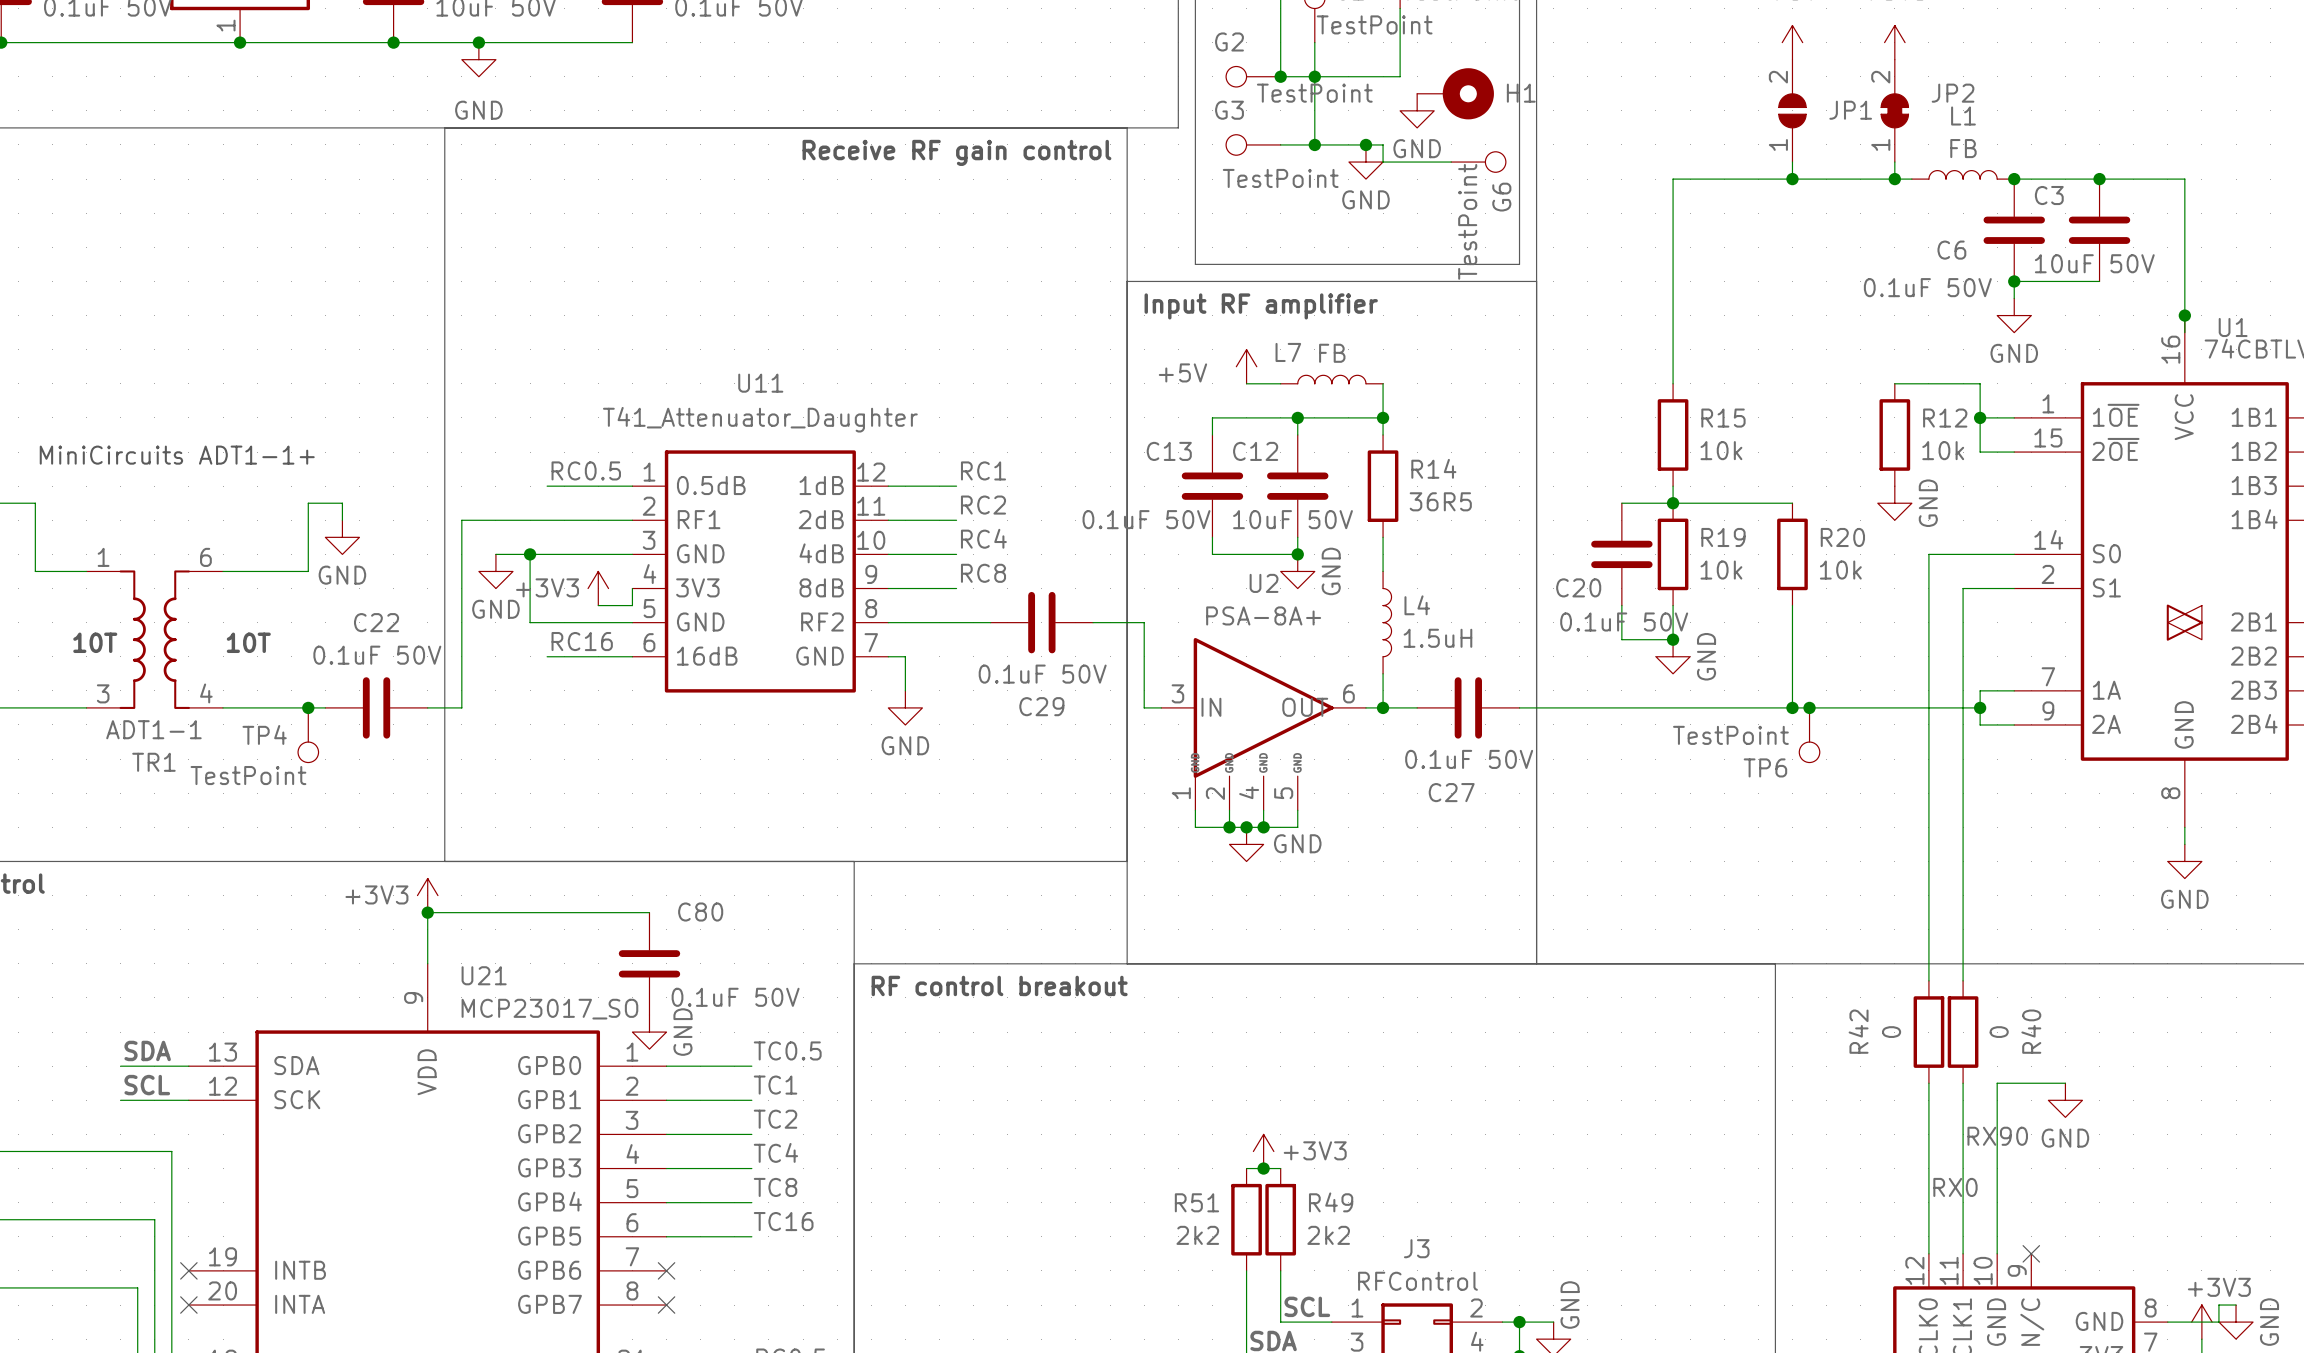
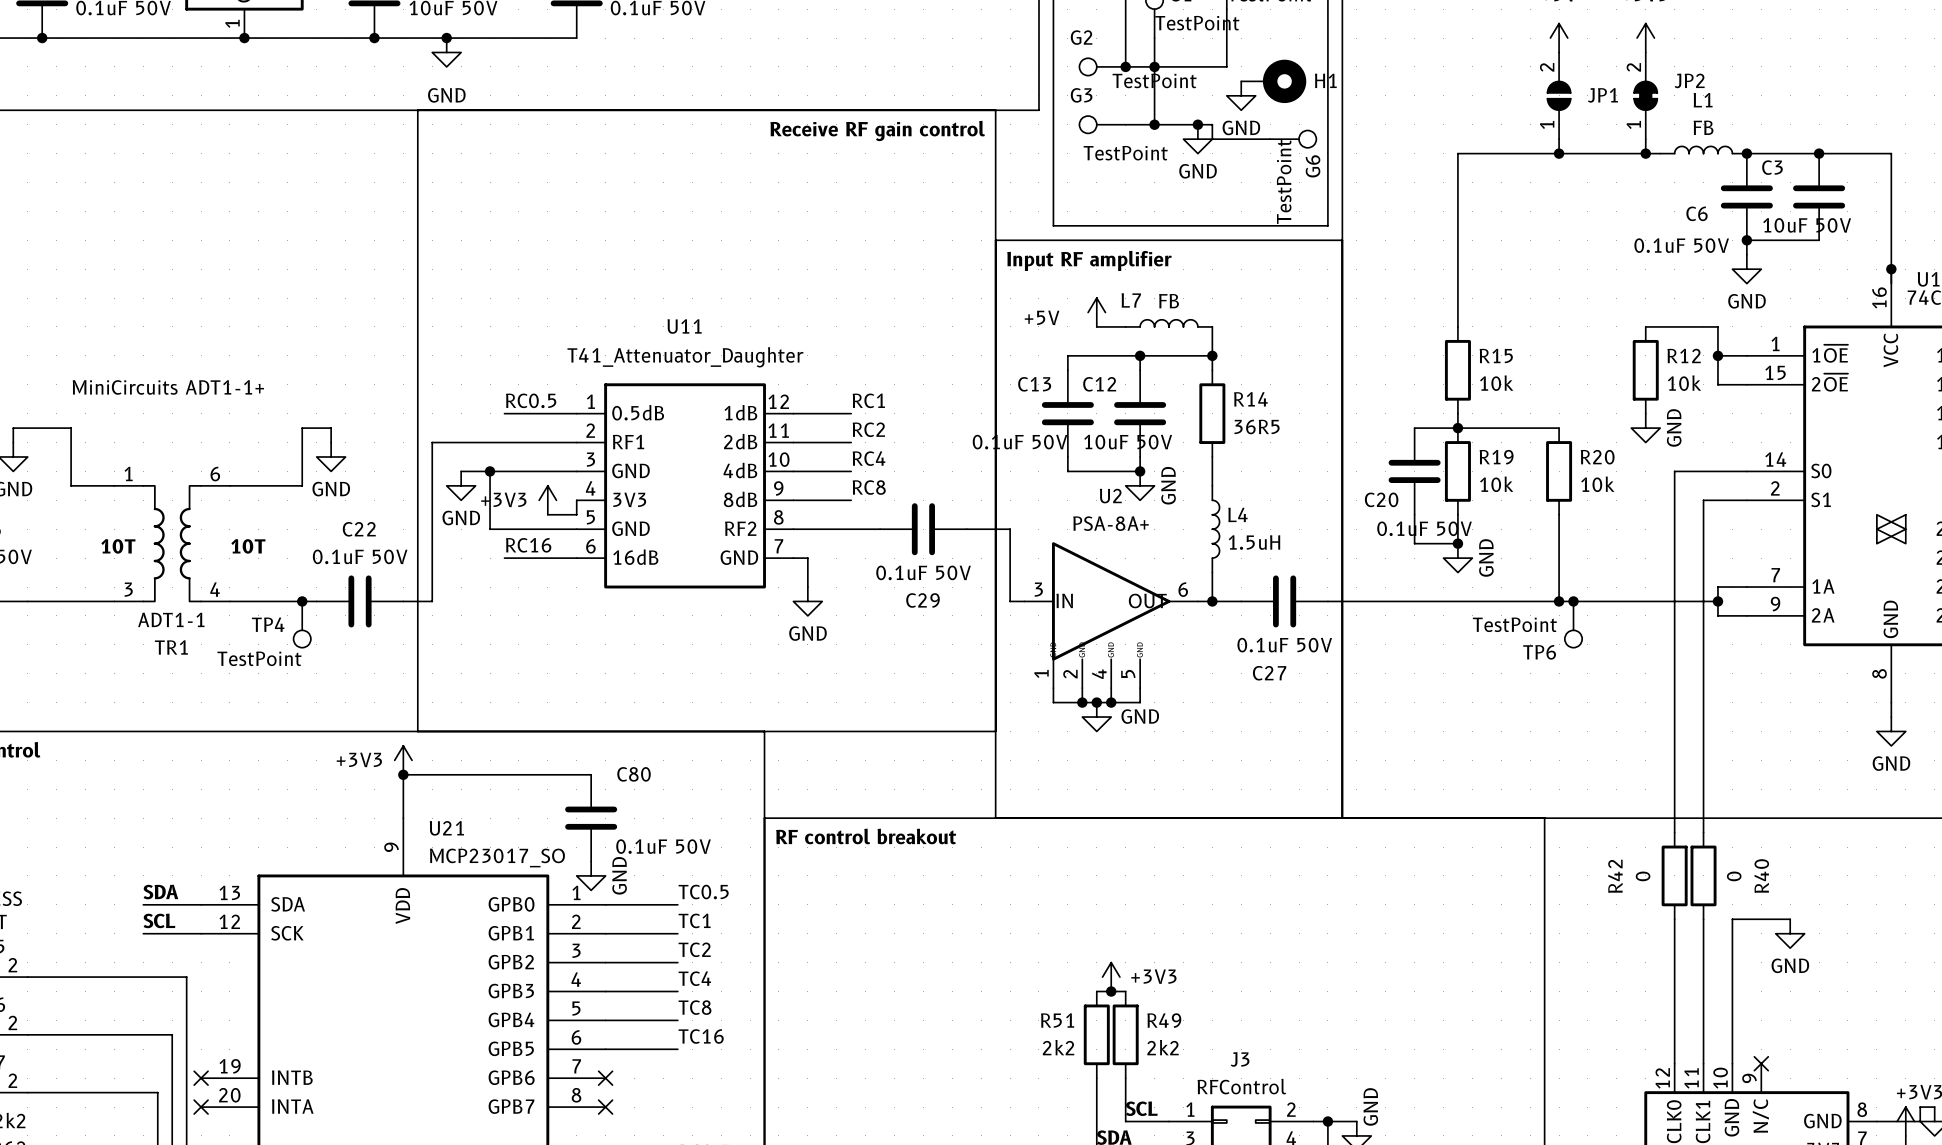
label: RX90 (1997, 1136) -> none
label: RX0 (1955, 1187) -> none

